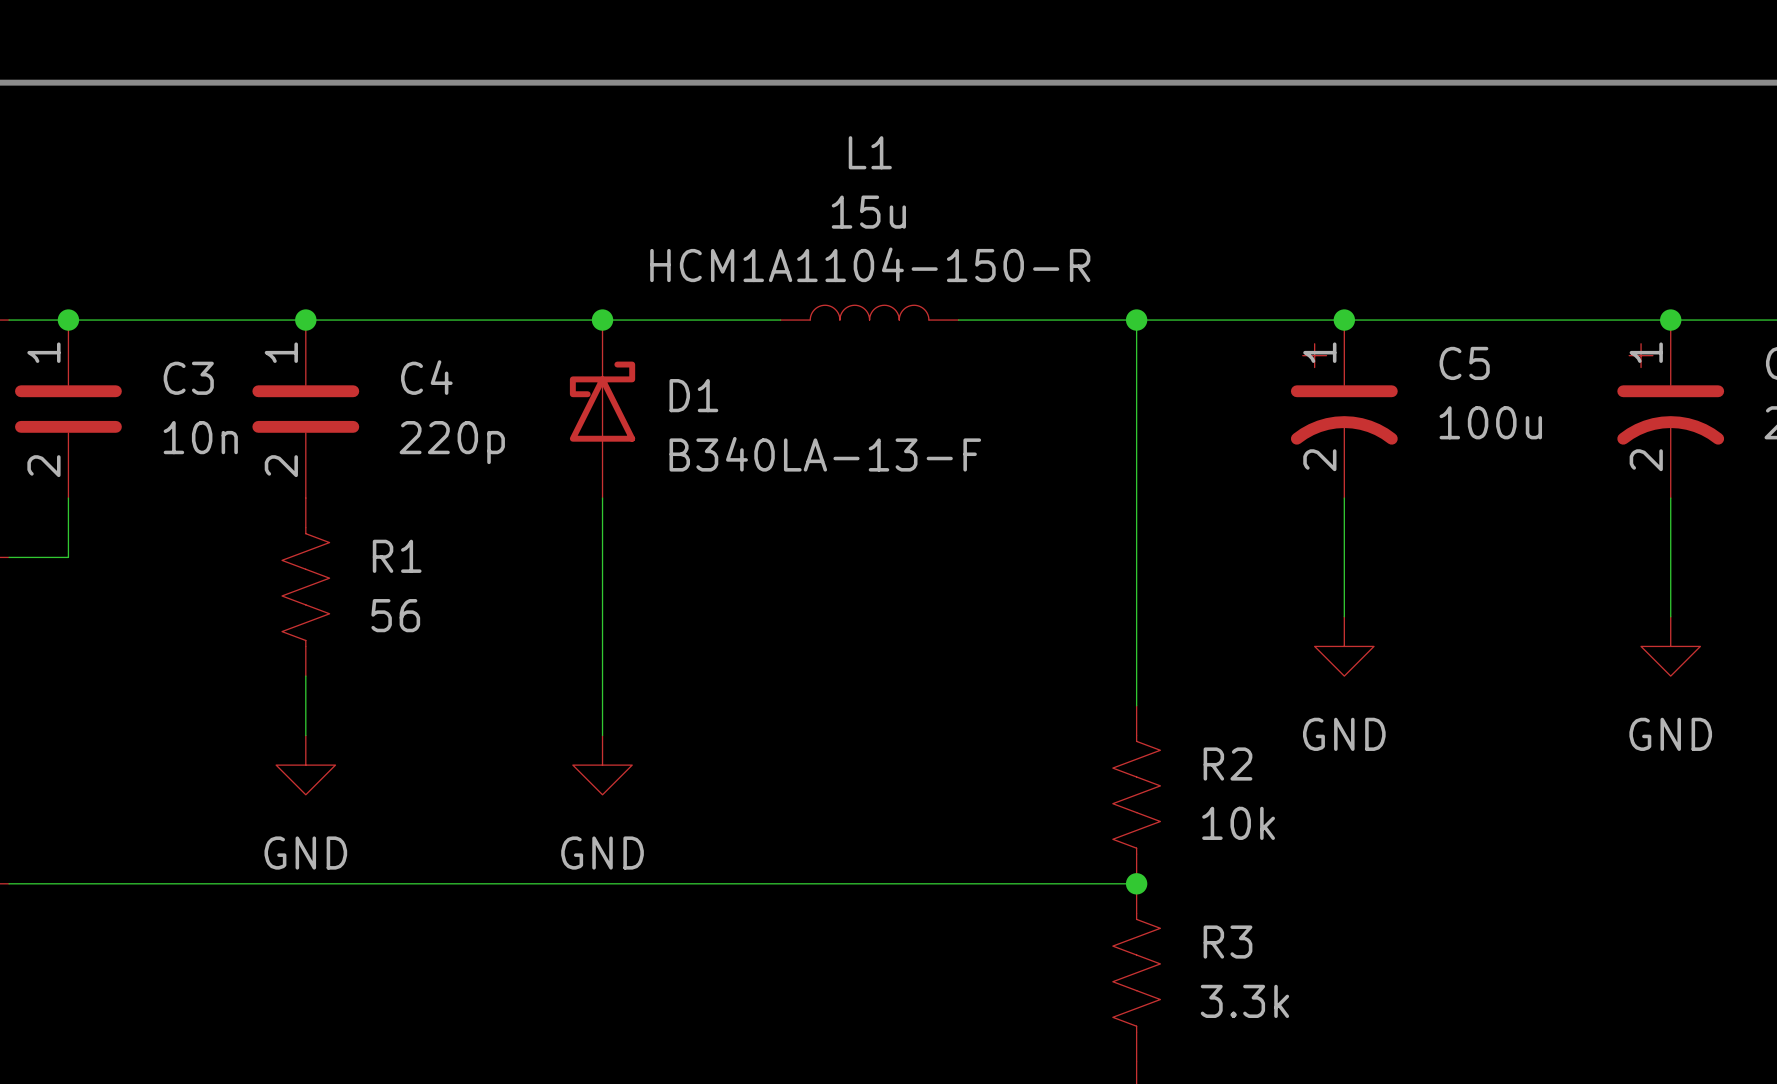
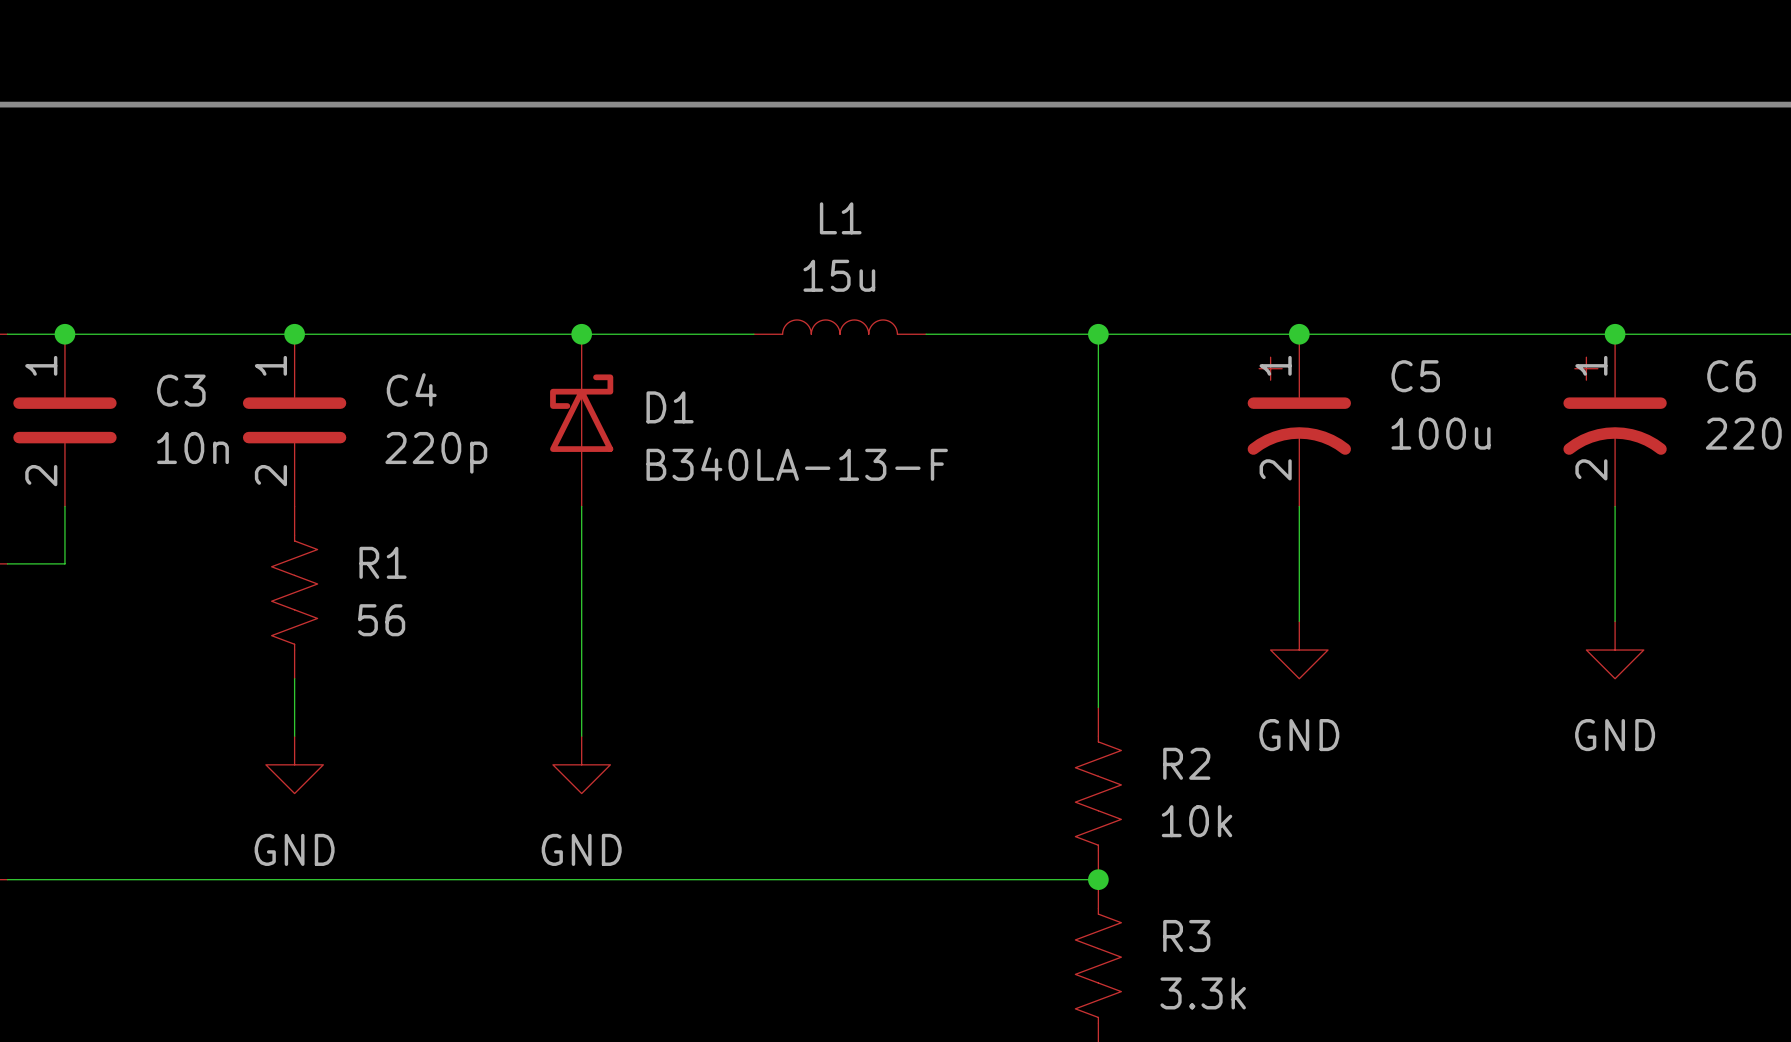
L1 name position: L1 (870, 152) -> L1 (840, 218)
L1 value position: 15u (868, 212) -> 15u (839, 275)
L1 text: HCM1A1104-150-R (870, 264) -> none

